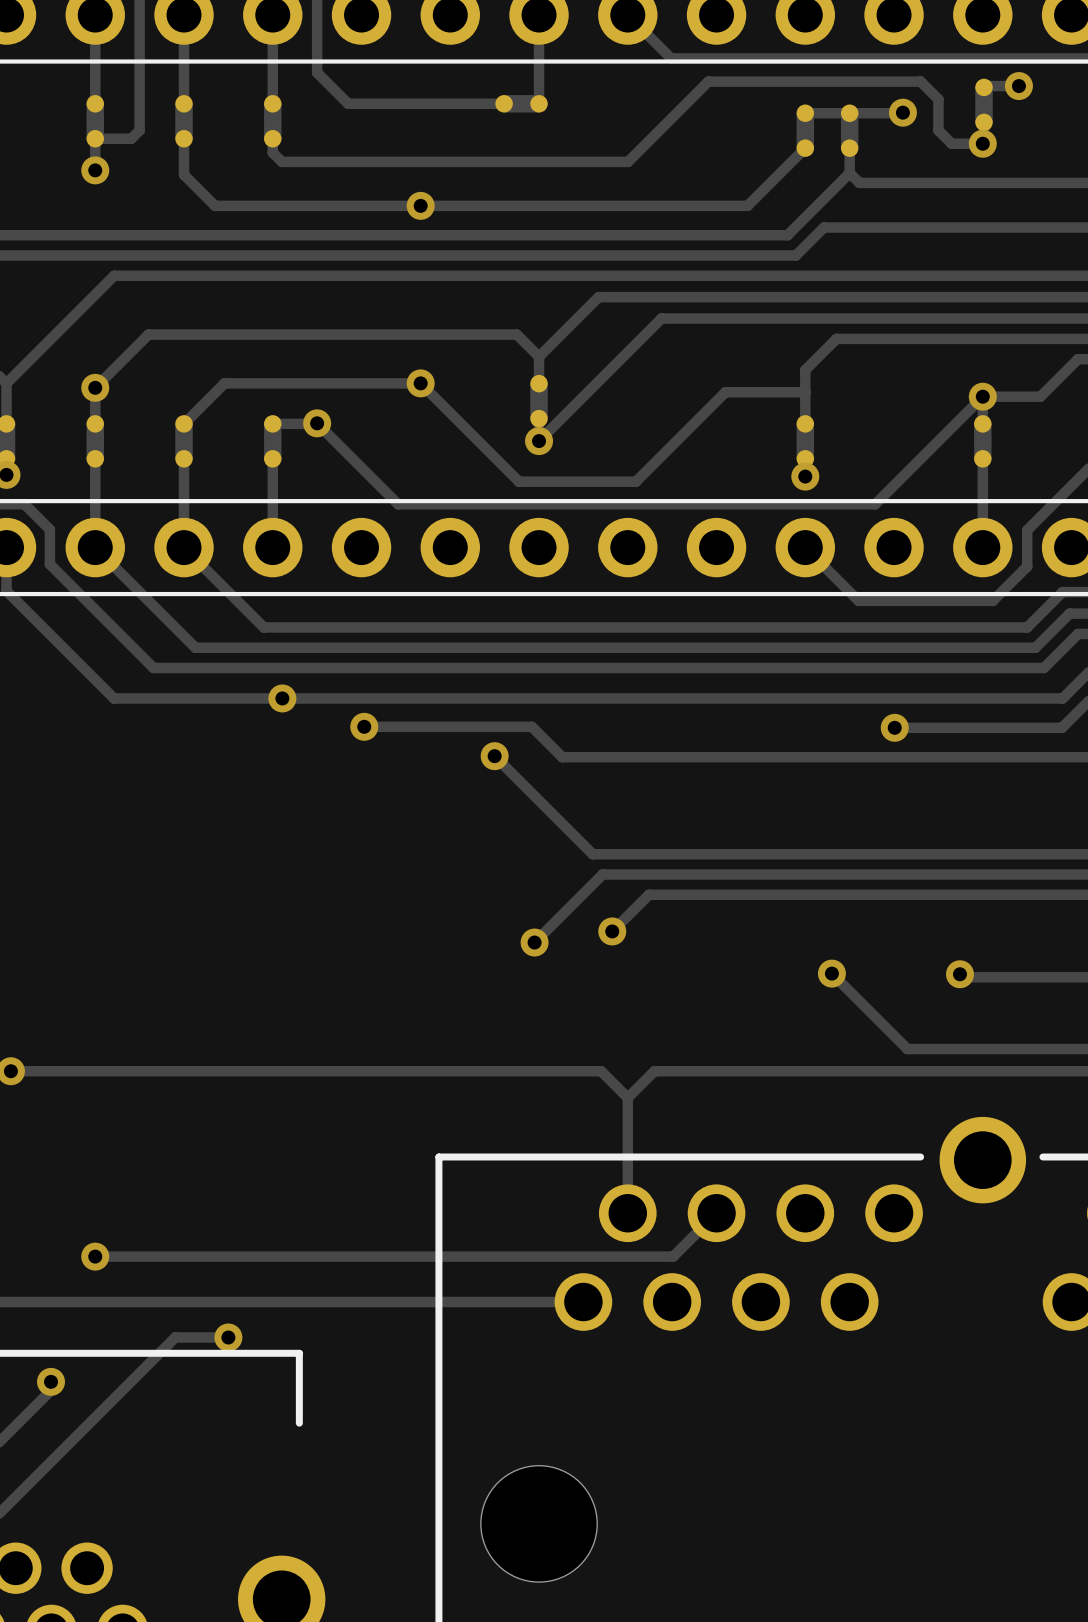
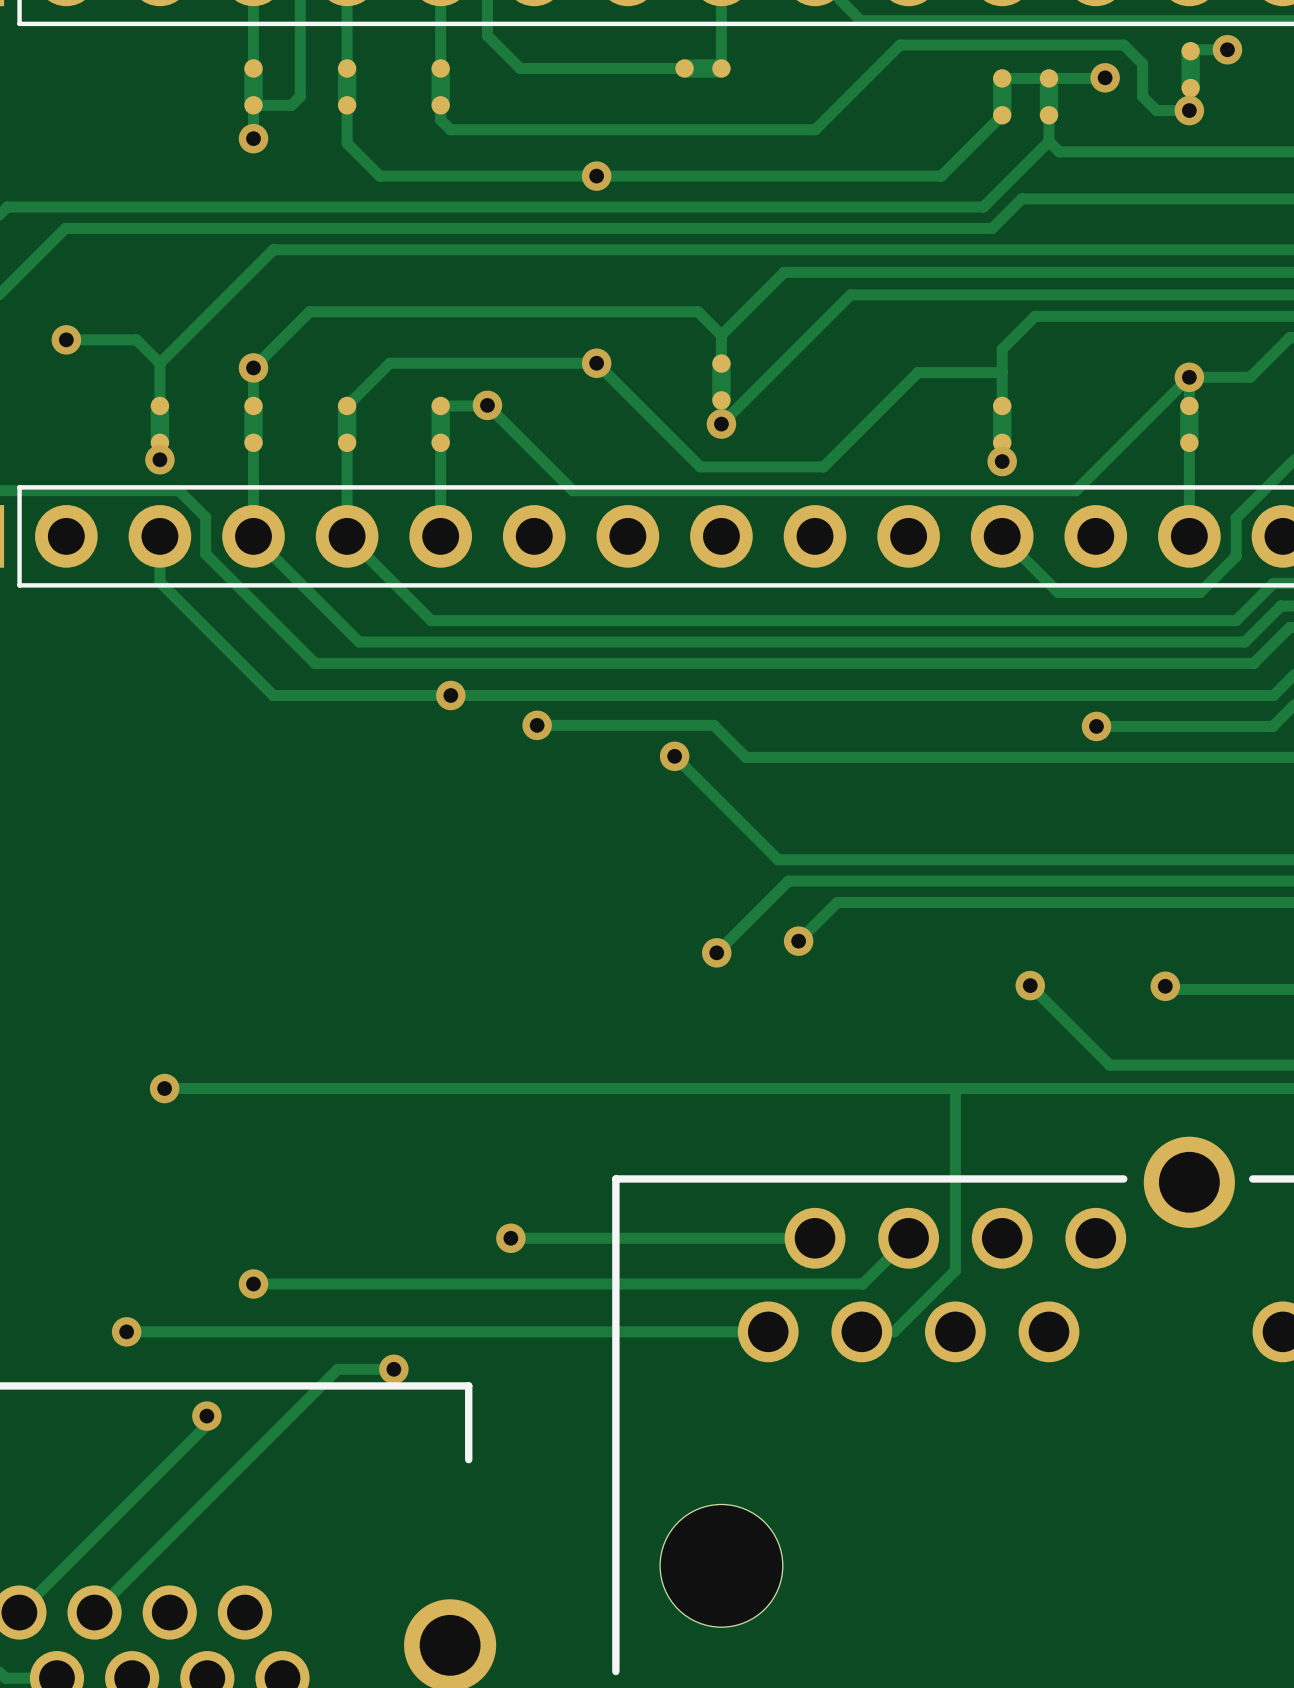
track: (601, 1071) (627, 1097) -> (786, 1088) (843, 1088)
track: (654, 1071) (627, 1097) -> none
track: none -> (955, 1088) (955, 1270) (894, 1331) (861, 1331)
track: (627, 1097) (627, 1213) -> (510, 1238) (815, 1238)
via: none -> (510, 1238)

